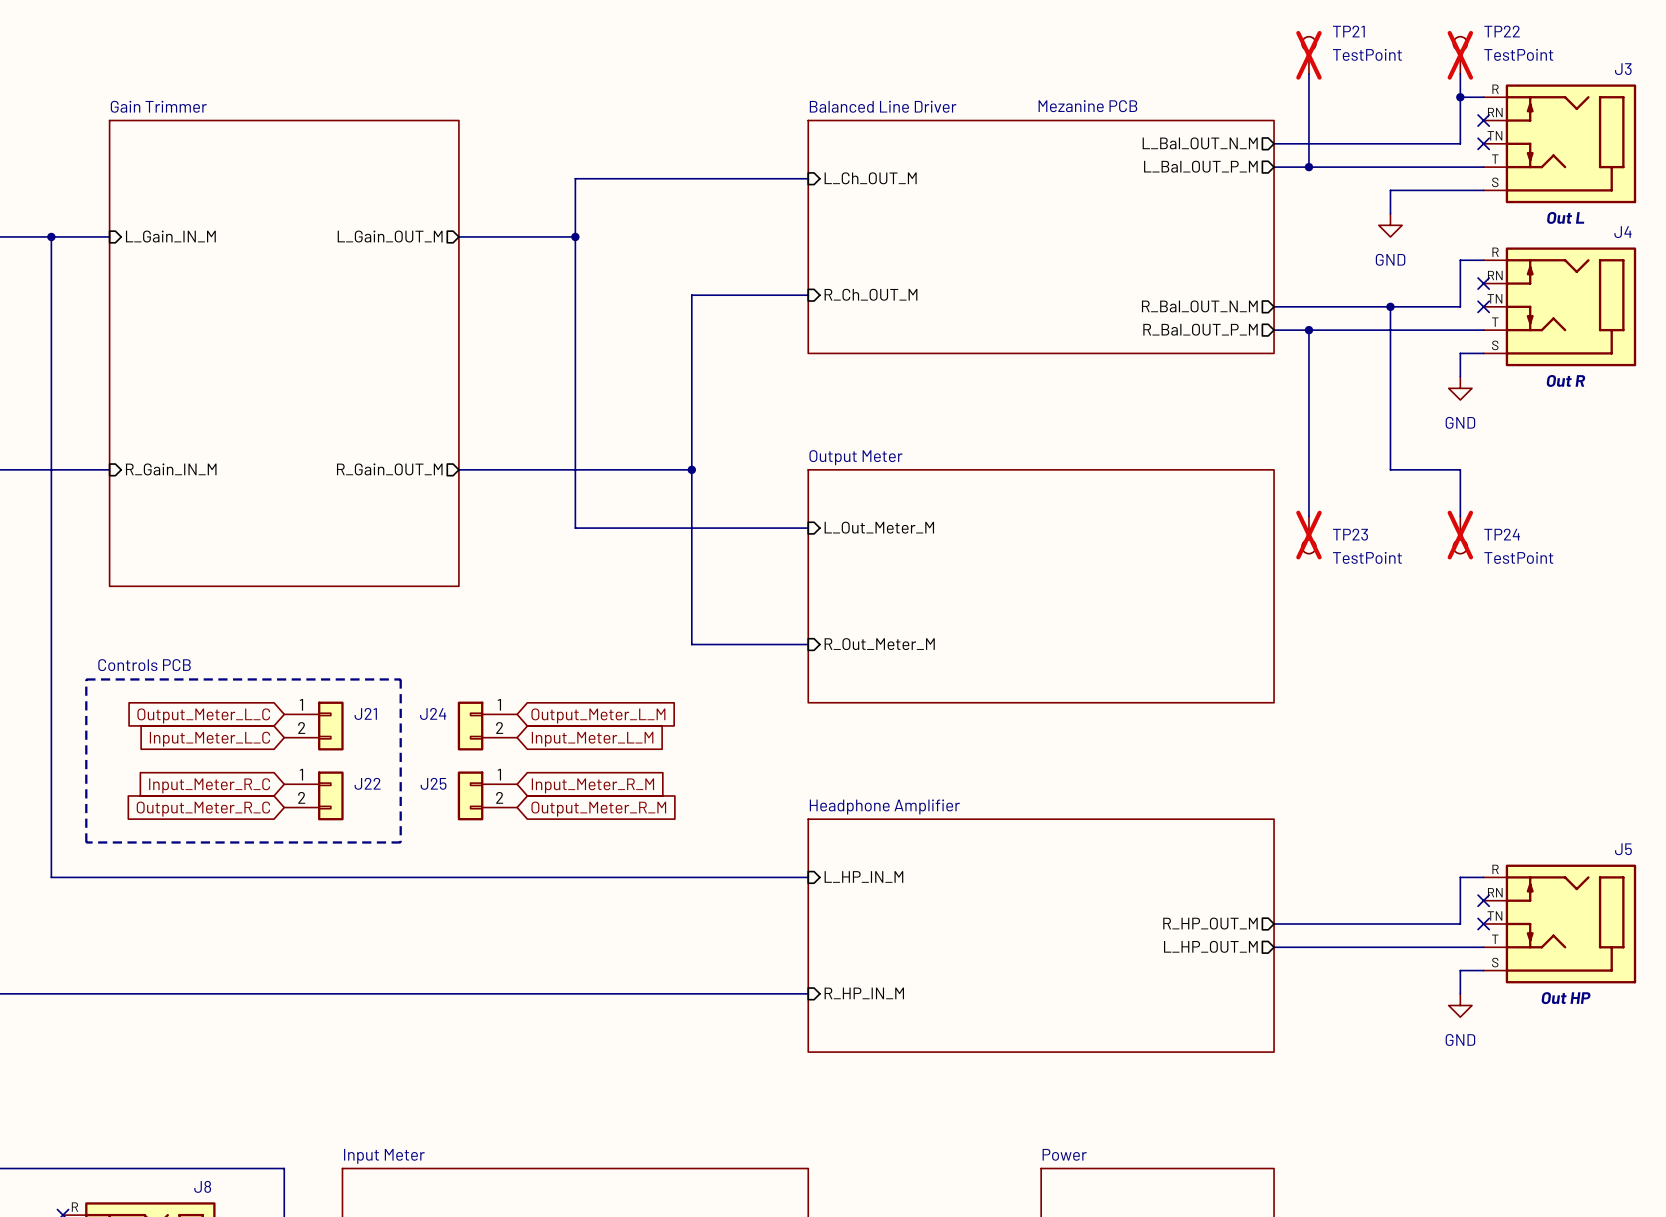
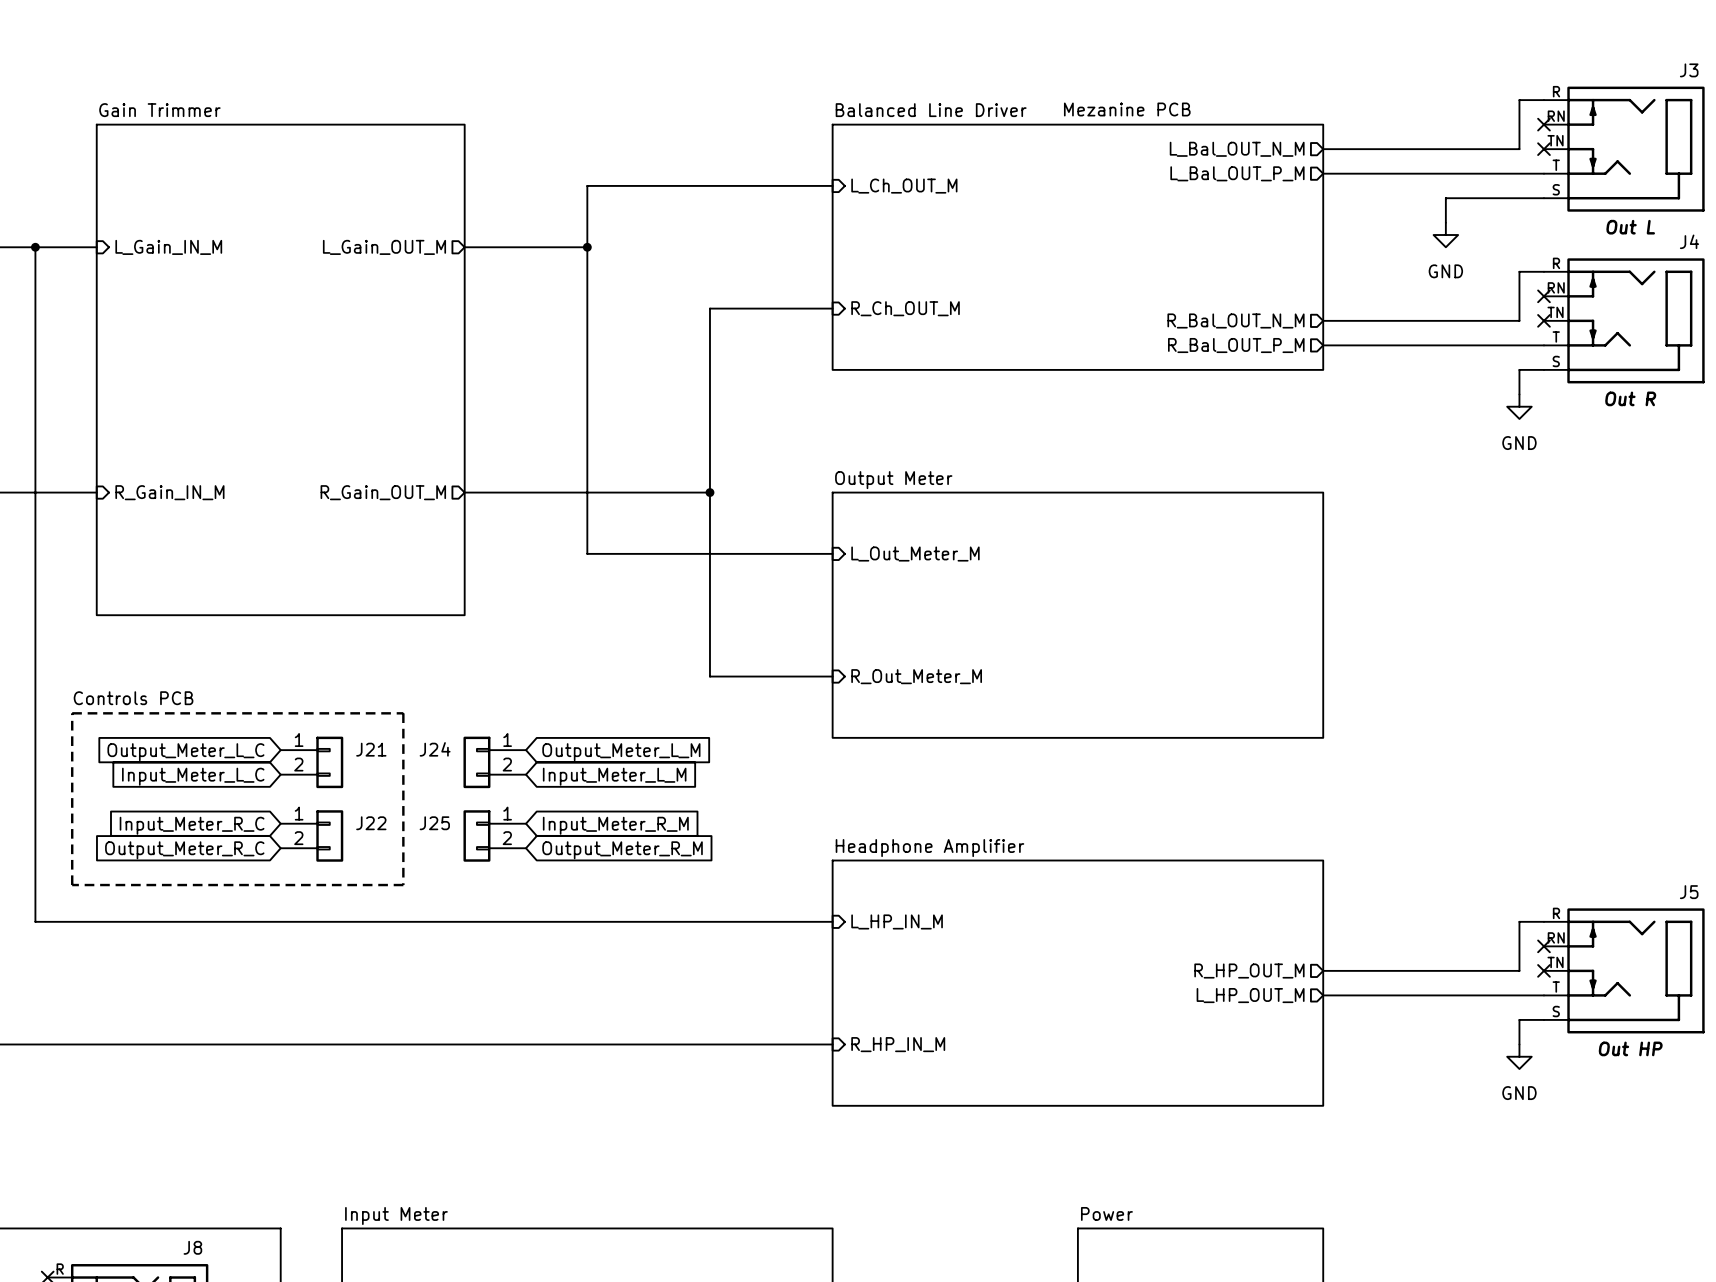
TP21: TestPoint (1308, 55) -> none
TP22: TestPoint (1460, 55) -> none
wire: (1308, 73) (1308, 167) -> none
wire: (1460, 73) (1460, 97) -> none
junction: (1460, 97) -> none
junction: (1308, 167) -> none
wire: (1390, 306) (1390, 469) (1460, 469) (1460, 516) -> none
junction: (1390, 306) -> none
wire: (1308, 330) (1308, 516) -> none
junction: (1308, 330) -> none
TP23: TestPoint (1308, 535) -> none
TP24: TestPoint (1460, 535) -> none

